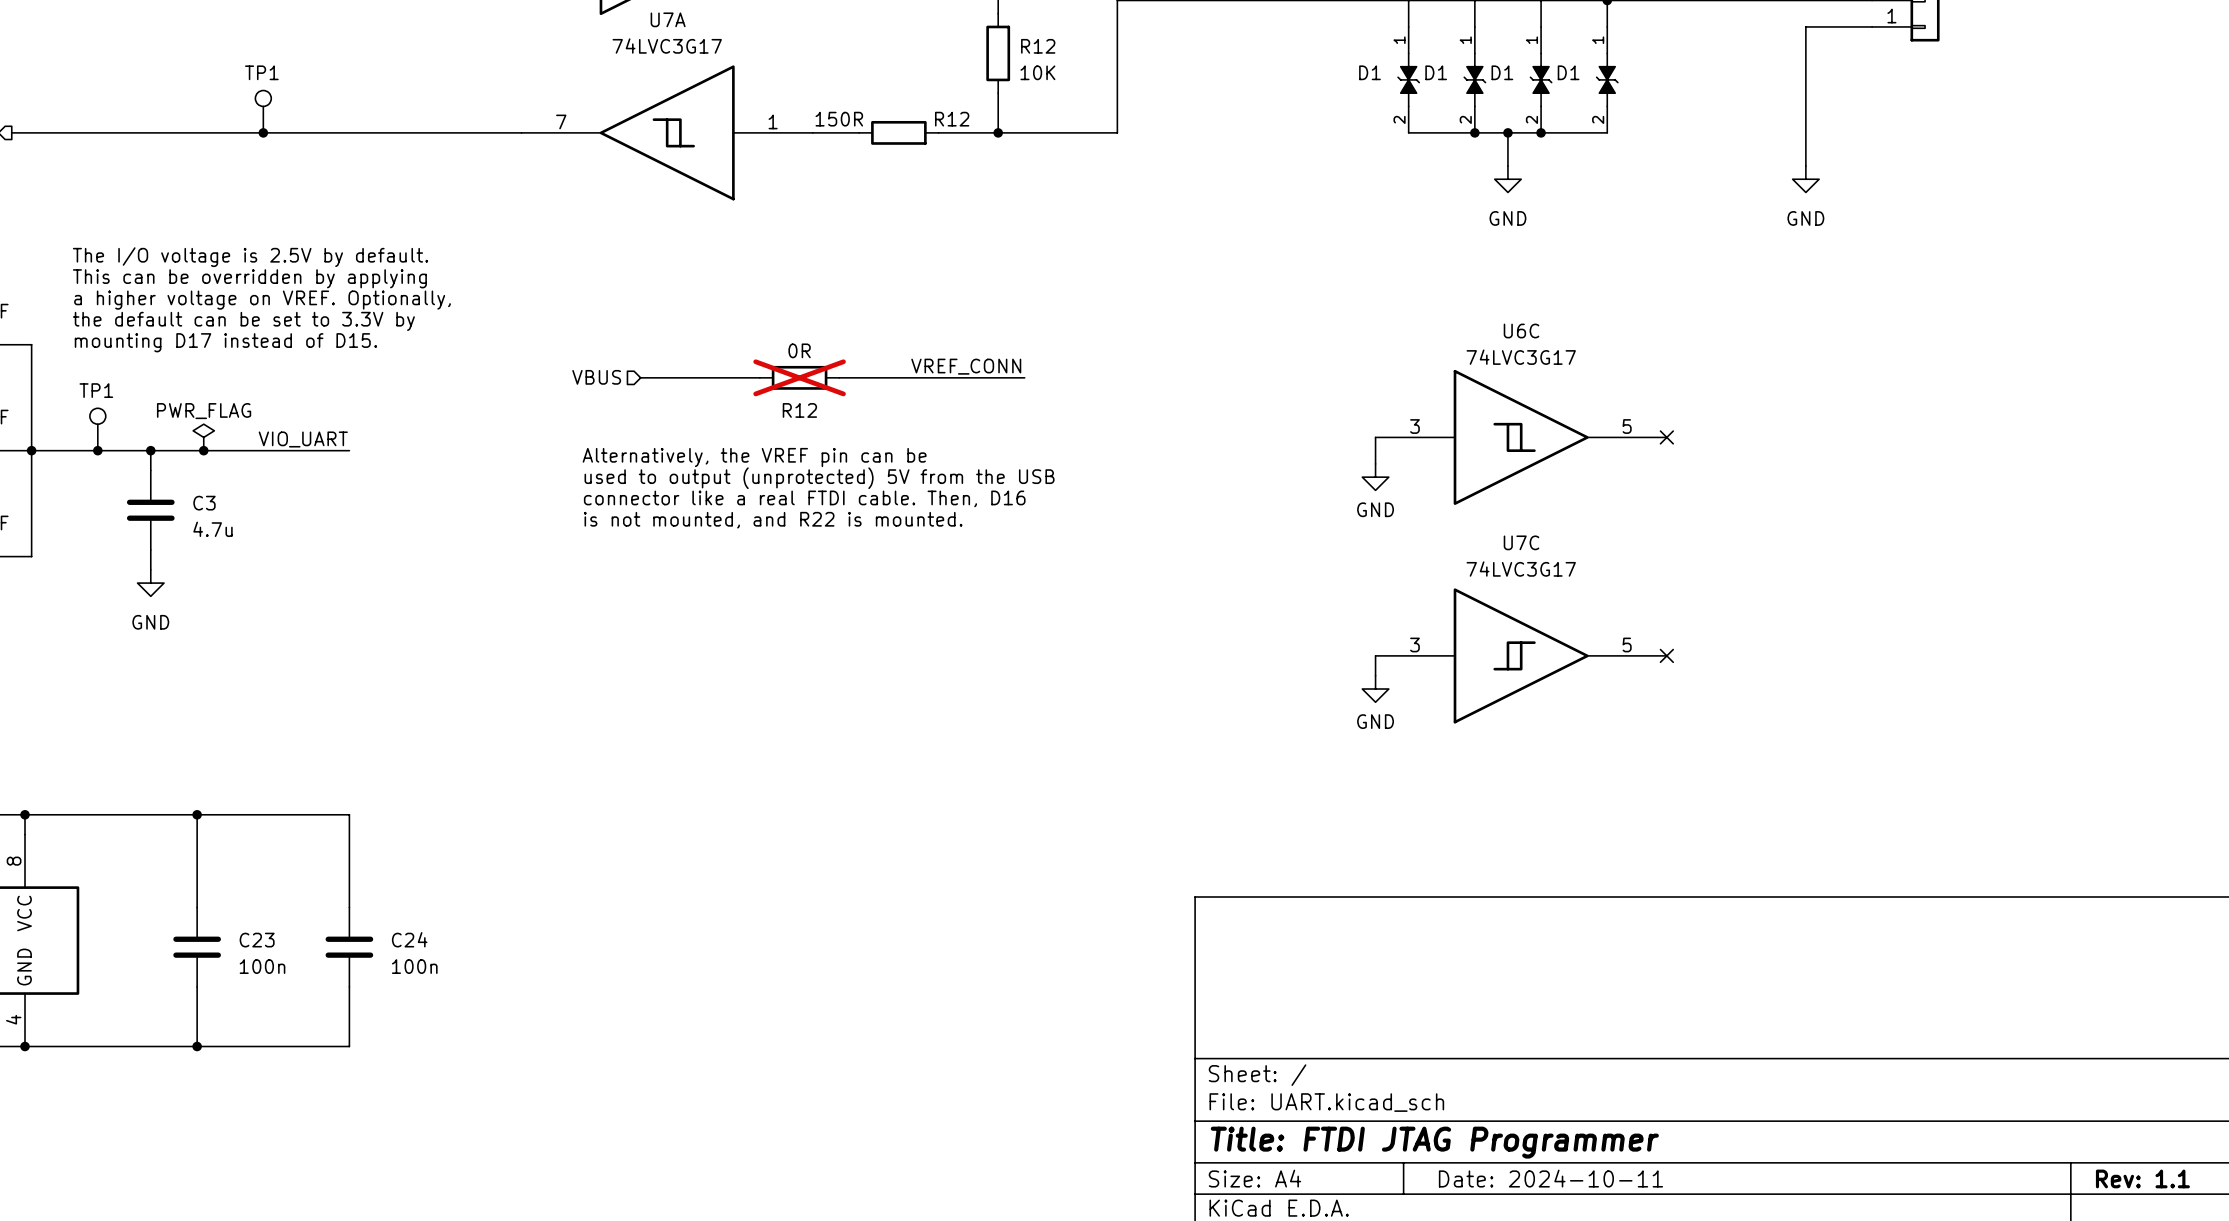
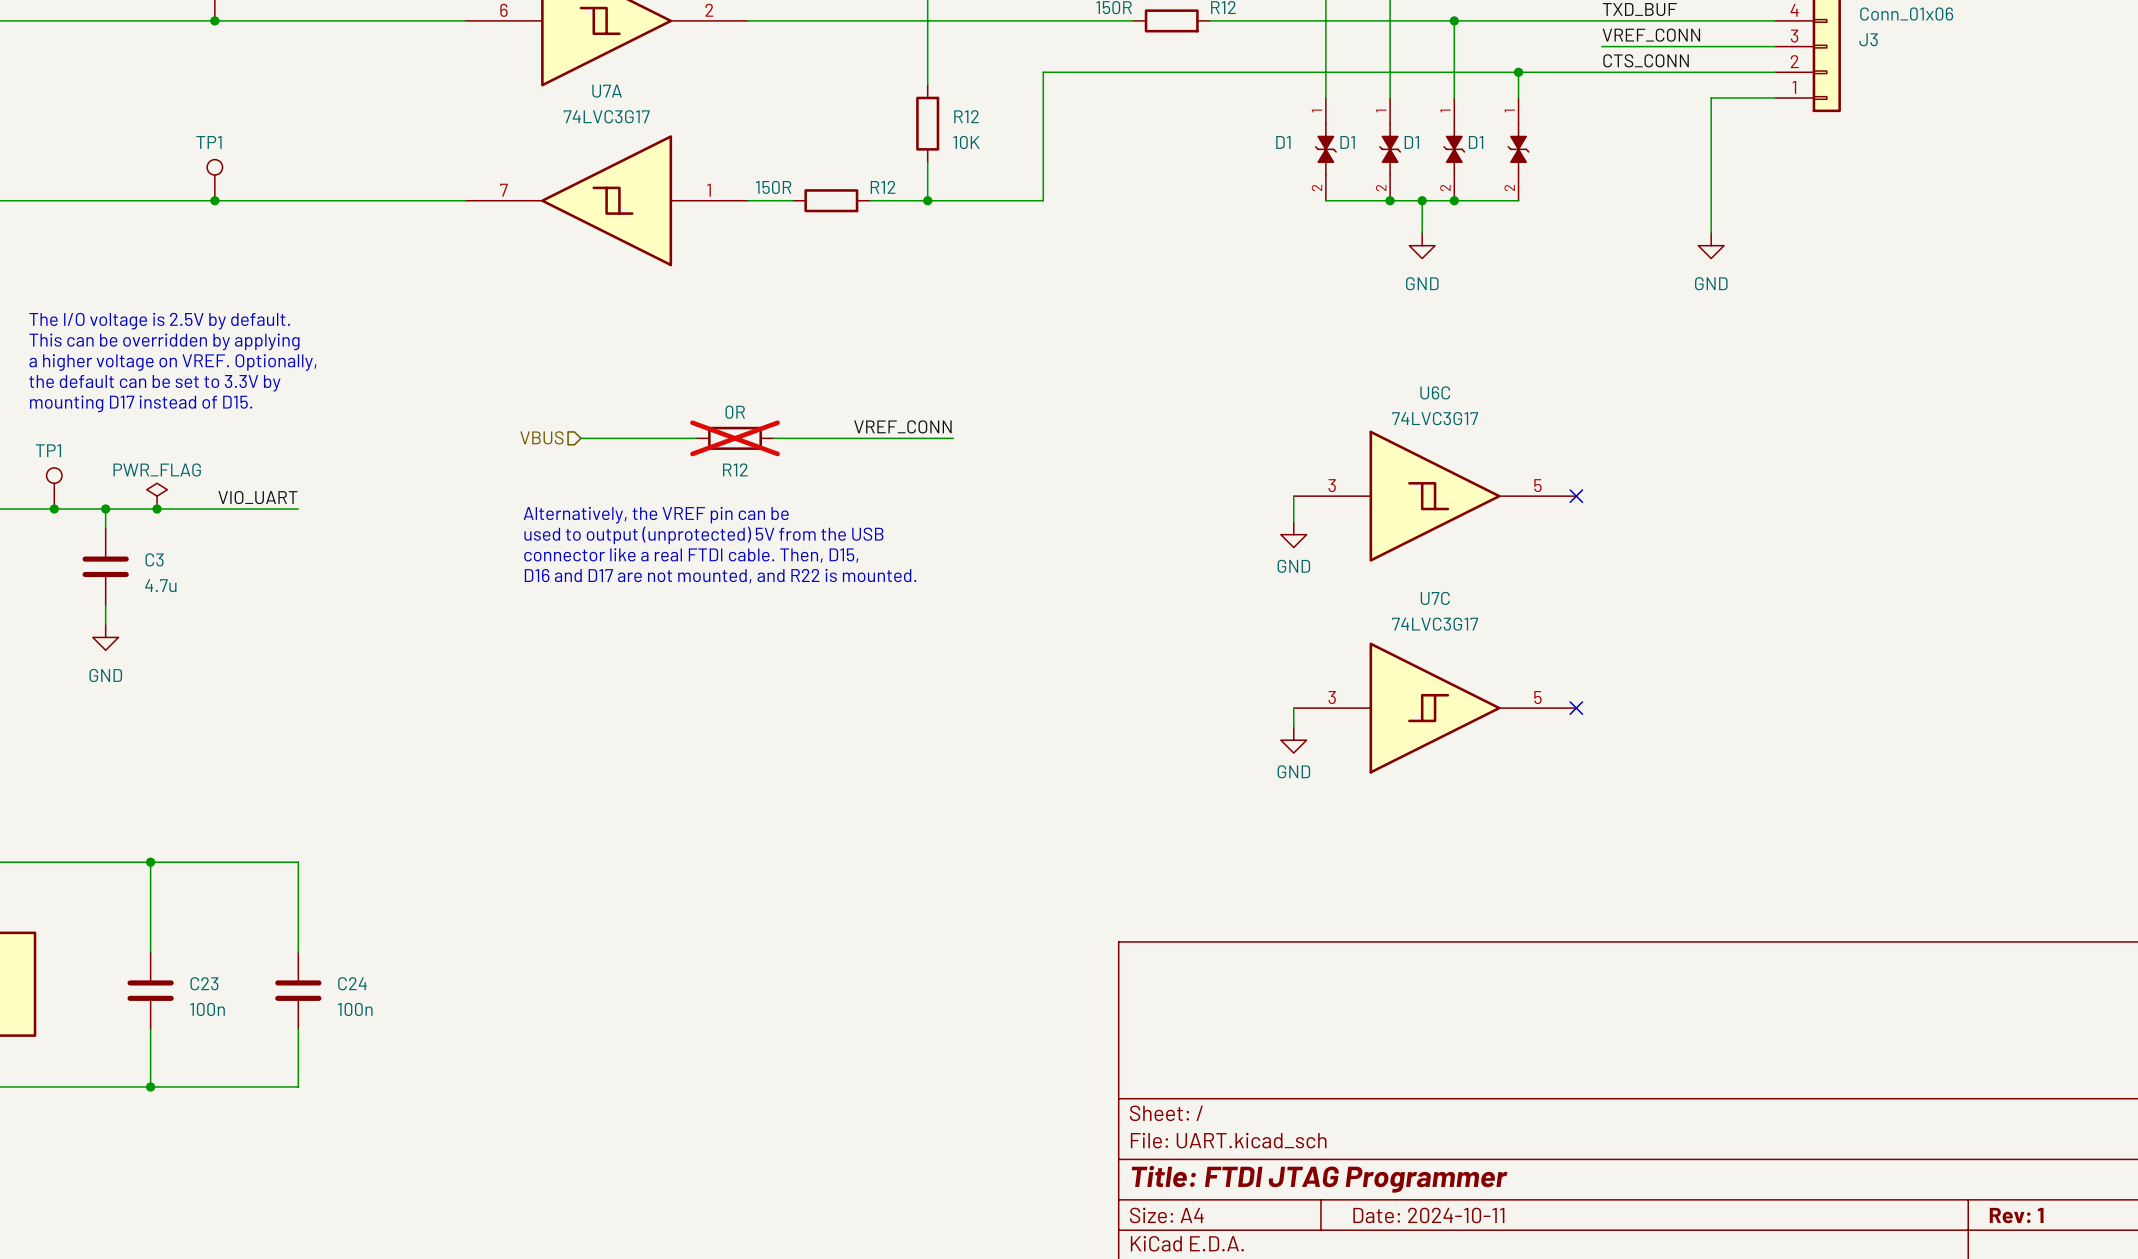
text: connector like a real FTDI cable. Then, D16 (804, 498) -> connector like a real FTDI cable. Then, D15, (691, 555)
text: is not mounted, and R22 is mounted. (773, 520) -> D16 and D17 are not mounted, and R22 is mounted. (720, 576)
title block: Rev: 1.1 (2142, 1178) -> Rev: 1 (2016, 1215)

